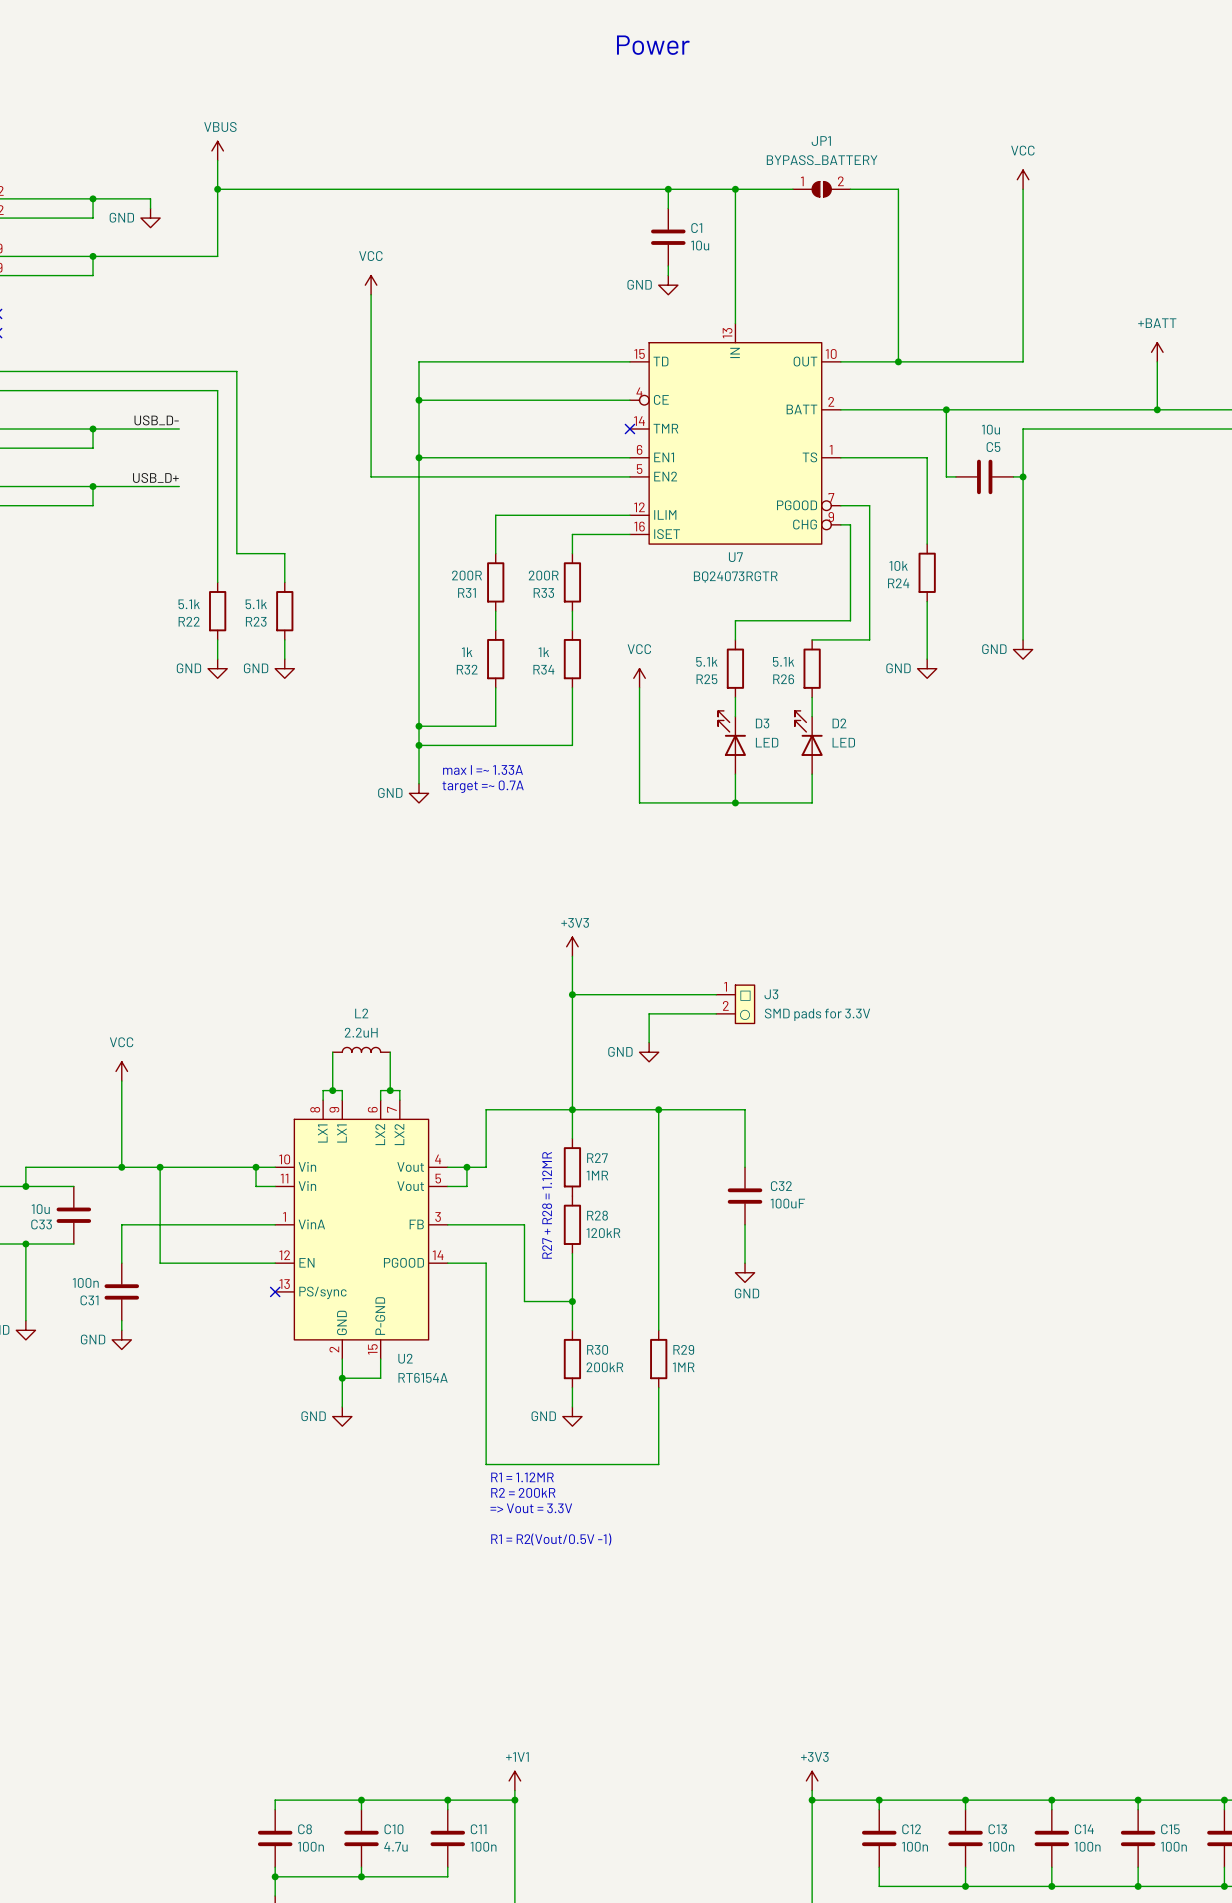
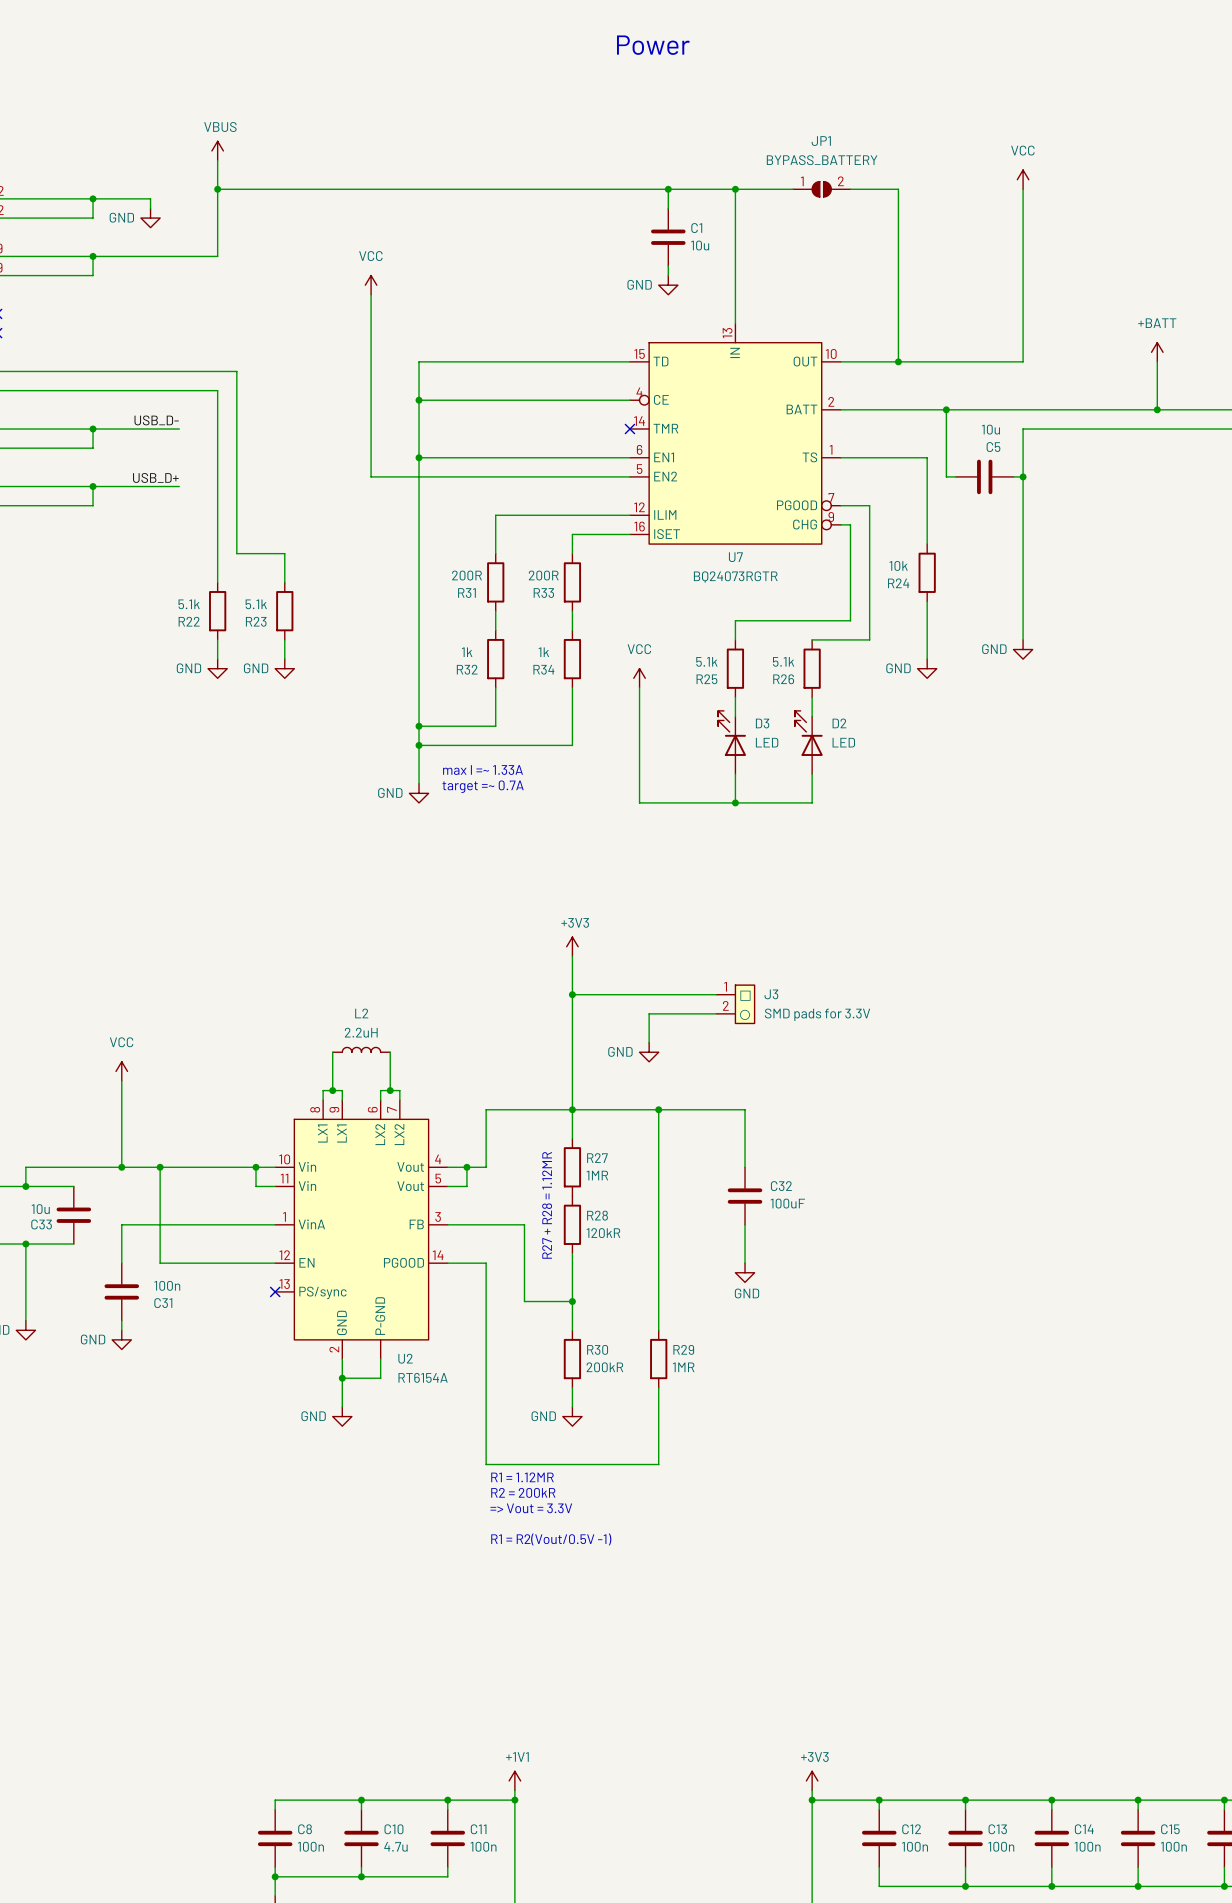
C31 value position: 100n (85, 1282) -> 100n (167, 1285)
C31 name position: C31 (89, 1300) -> C31 (163, 1303)
U2 pin number: 15 (372, 1349) -> none

